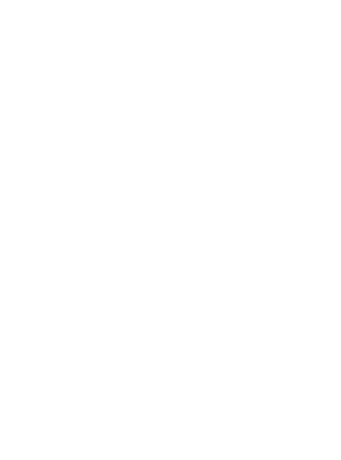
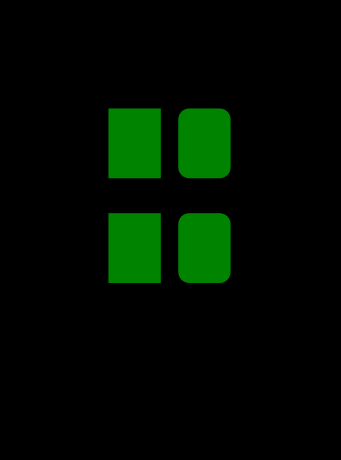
part: none -> (169, 143)
part: none -> (169, 248)

